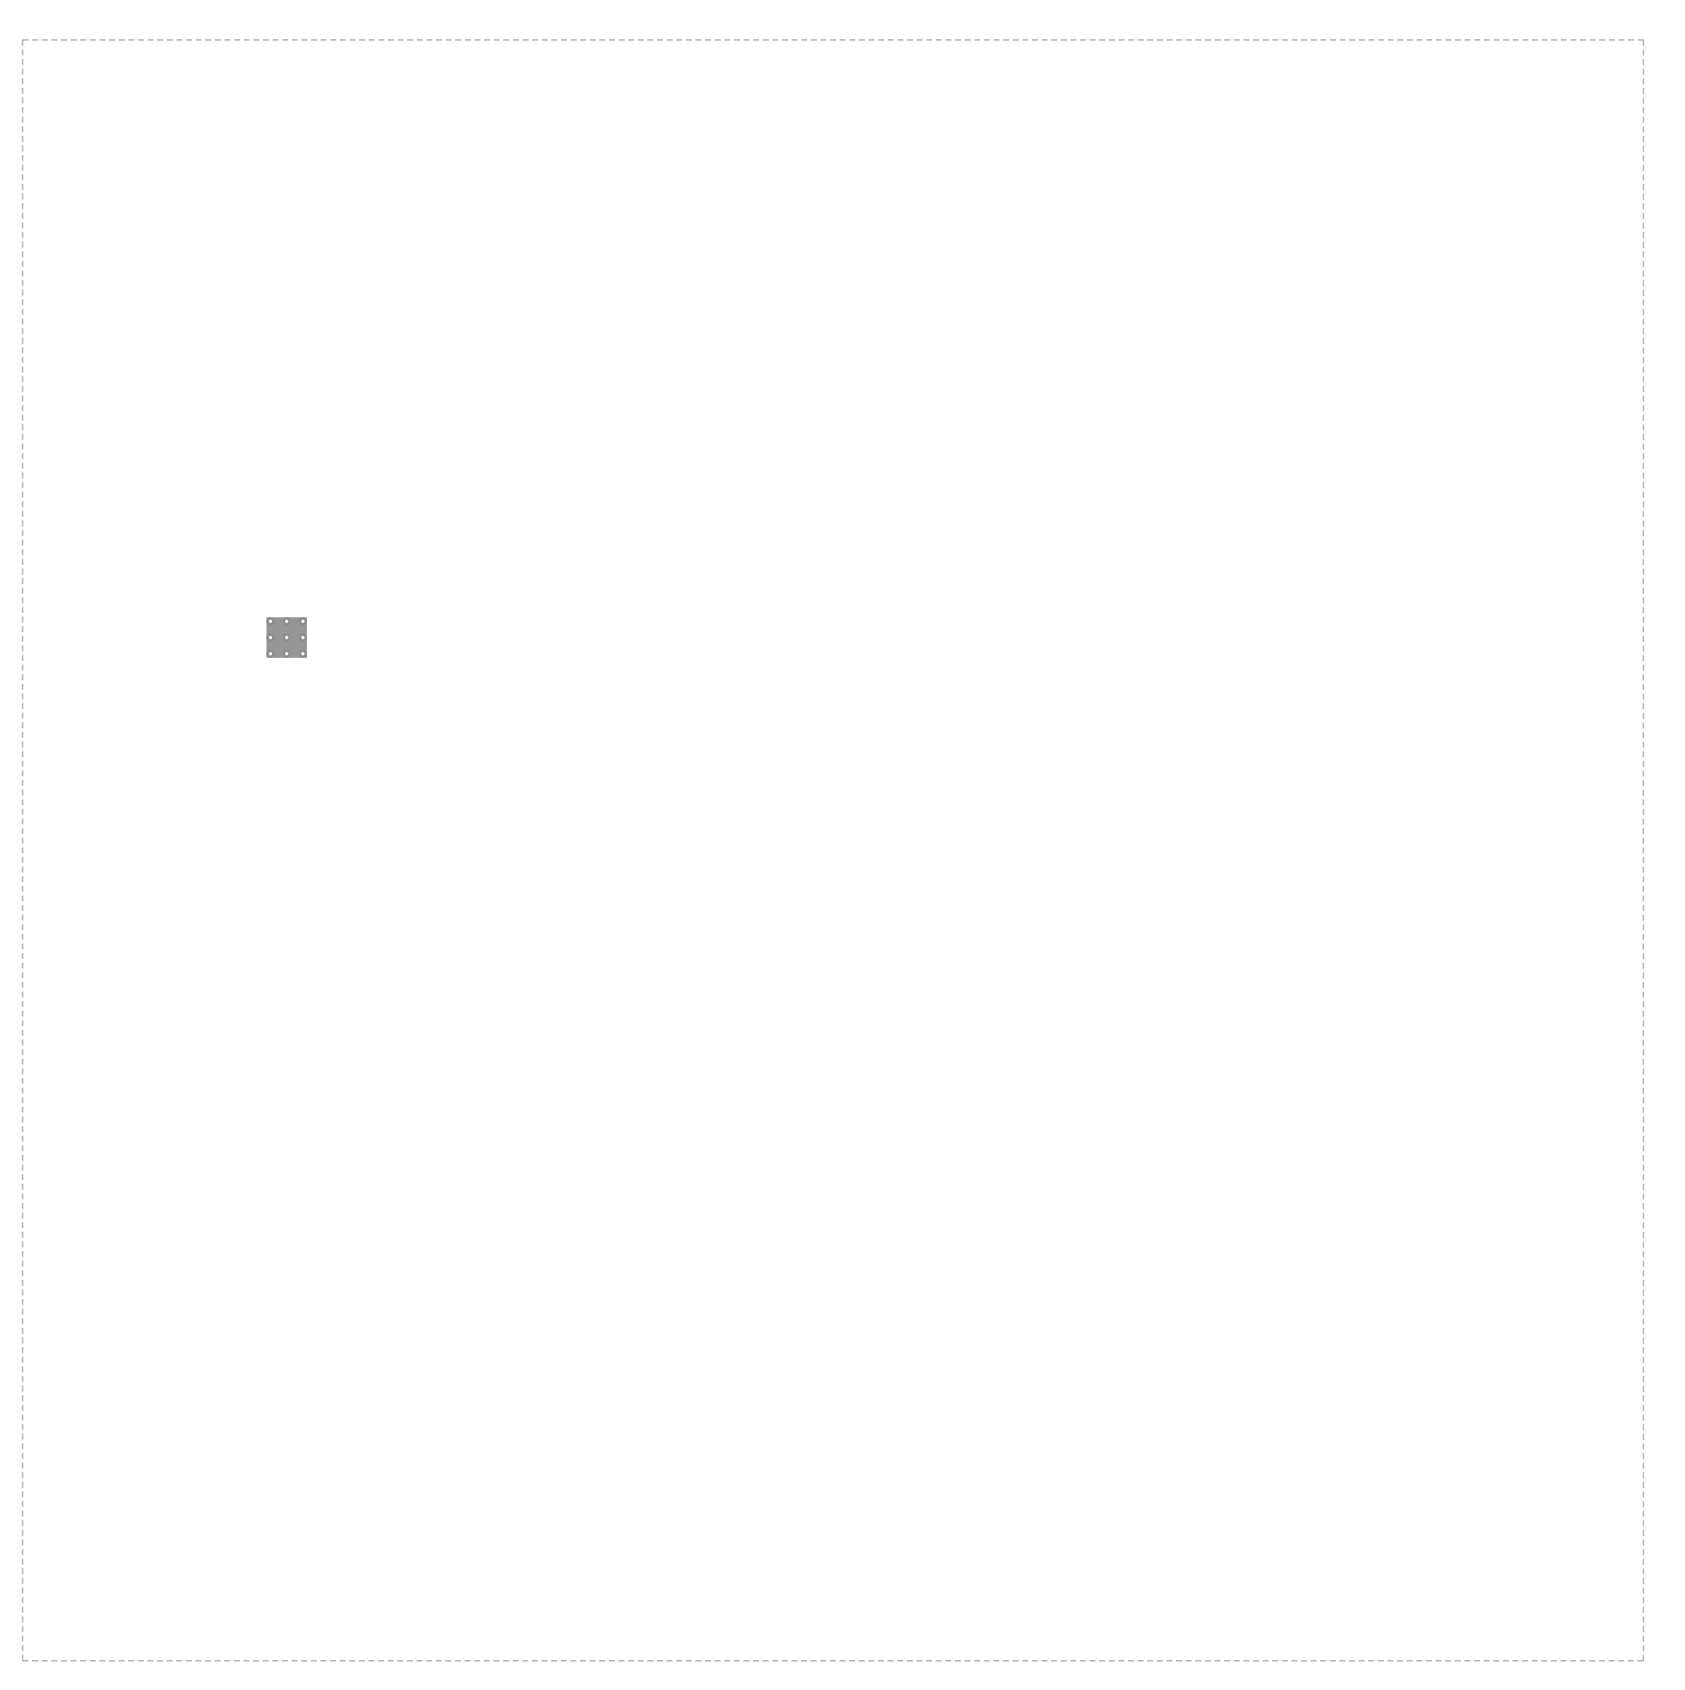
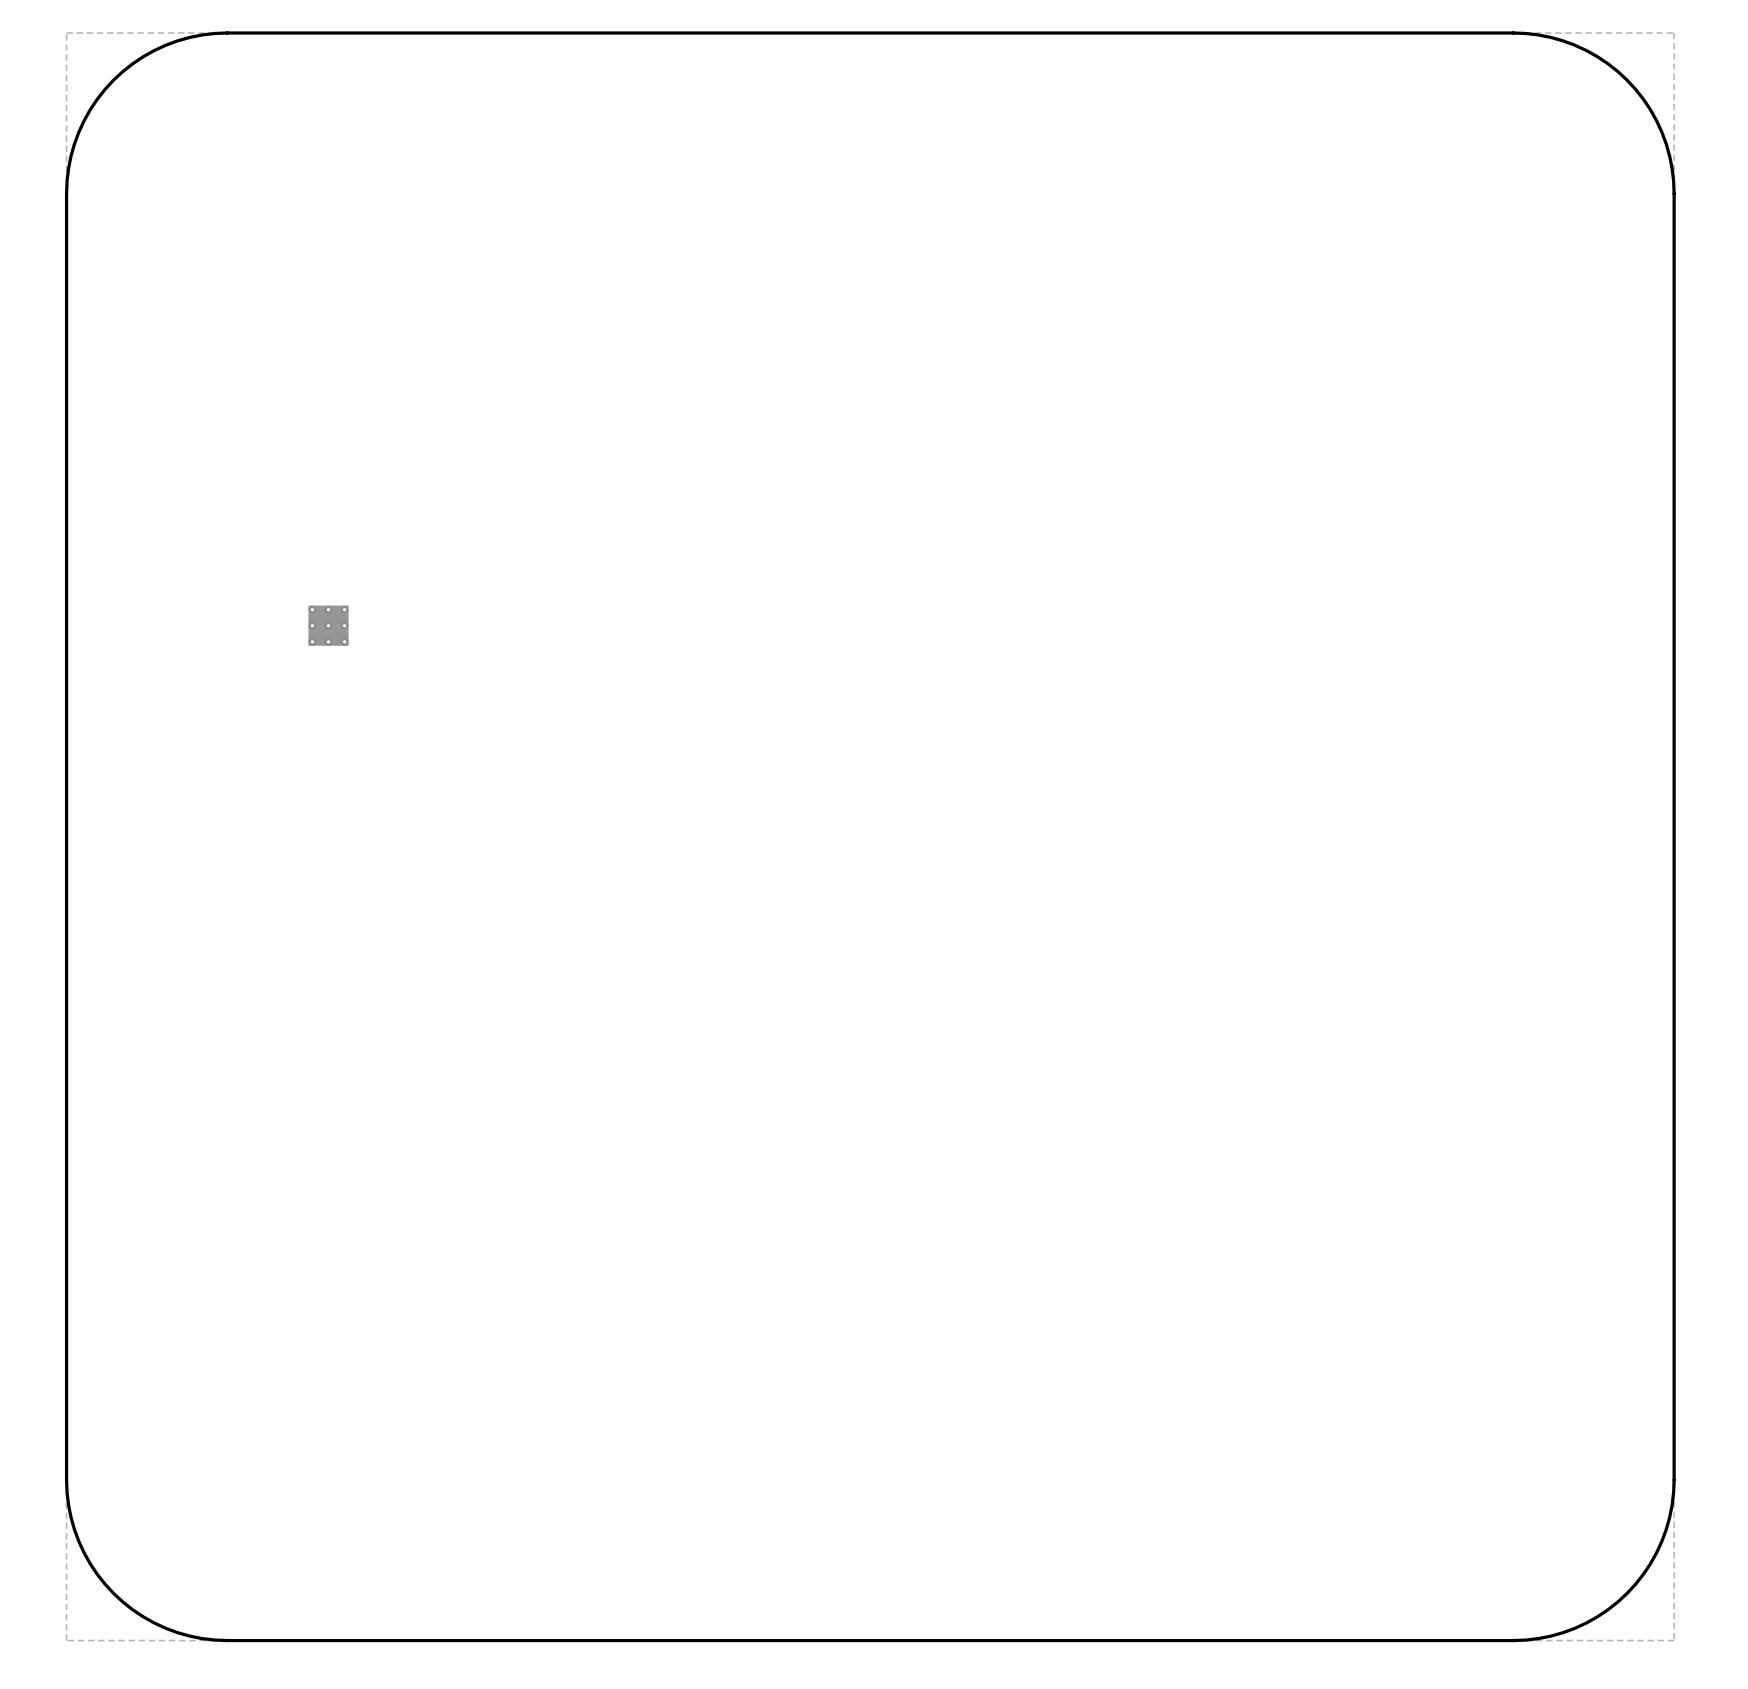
board edge: none -> (1513, 32) (214, 33) (189, 37) (154, 50) (122, 71) (105, 89) (90, 109) (74, 144) (68, 168) (66, 193) (66, 1479) (71, 1517) (84, 1552) (97, 1574) (122, 1602) (143, 1616) (165, 1628) (189, 1636) (227, 1640) (1513, 1640) (1550, 1636) (1586, 1623) (1607, 1609) (1635, 1584) (1656, 1552) (1666, 1529) (1672, 1504) (1674, 1479) (1673, 181) (1666, 144) (1656, 120) (1643, 99) (1617, 71) (1597, 56) (1574, 45) (1538, 34) (1513, 32)

